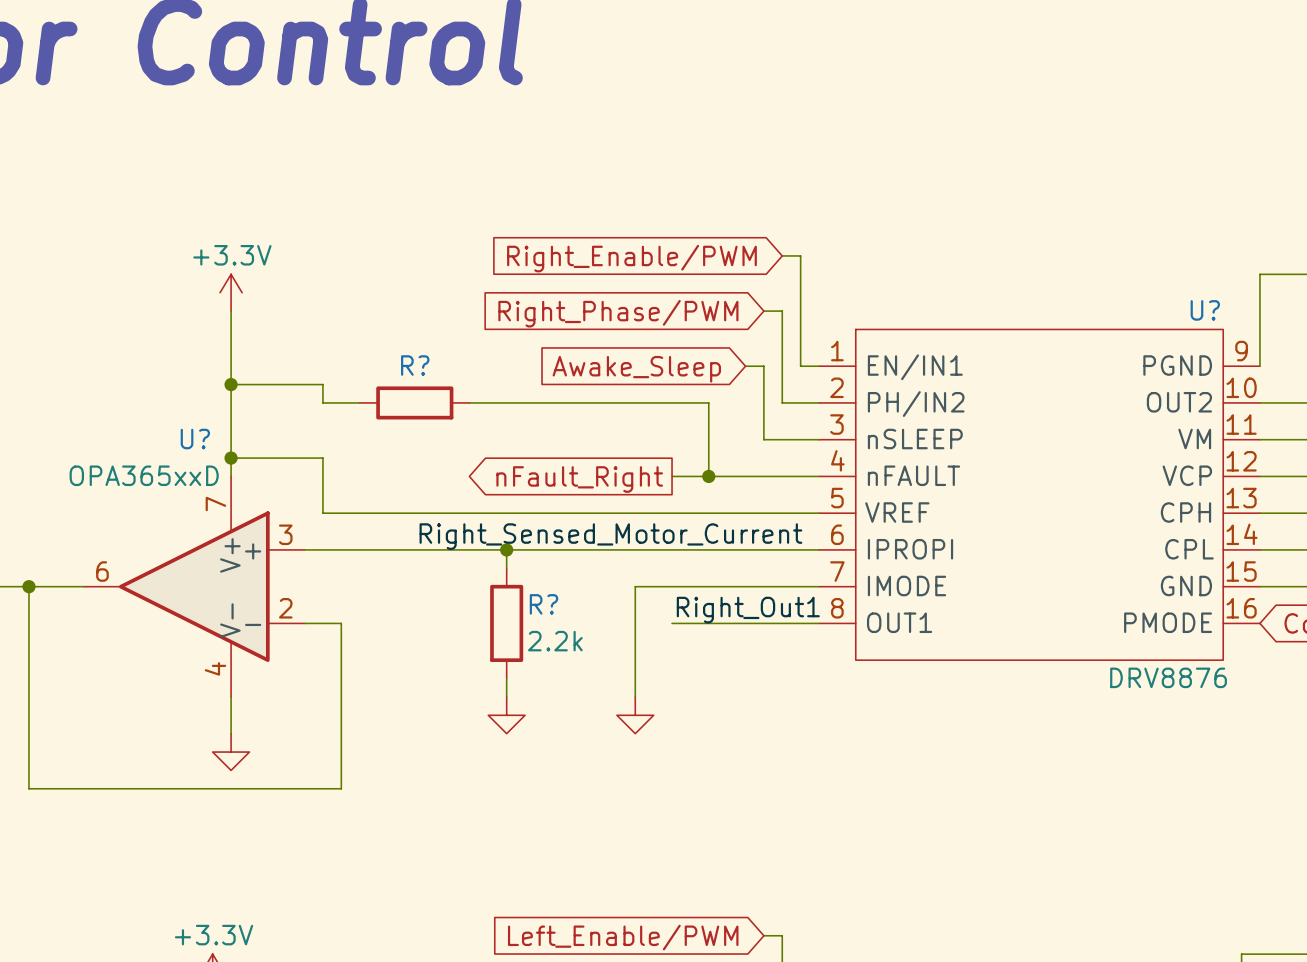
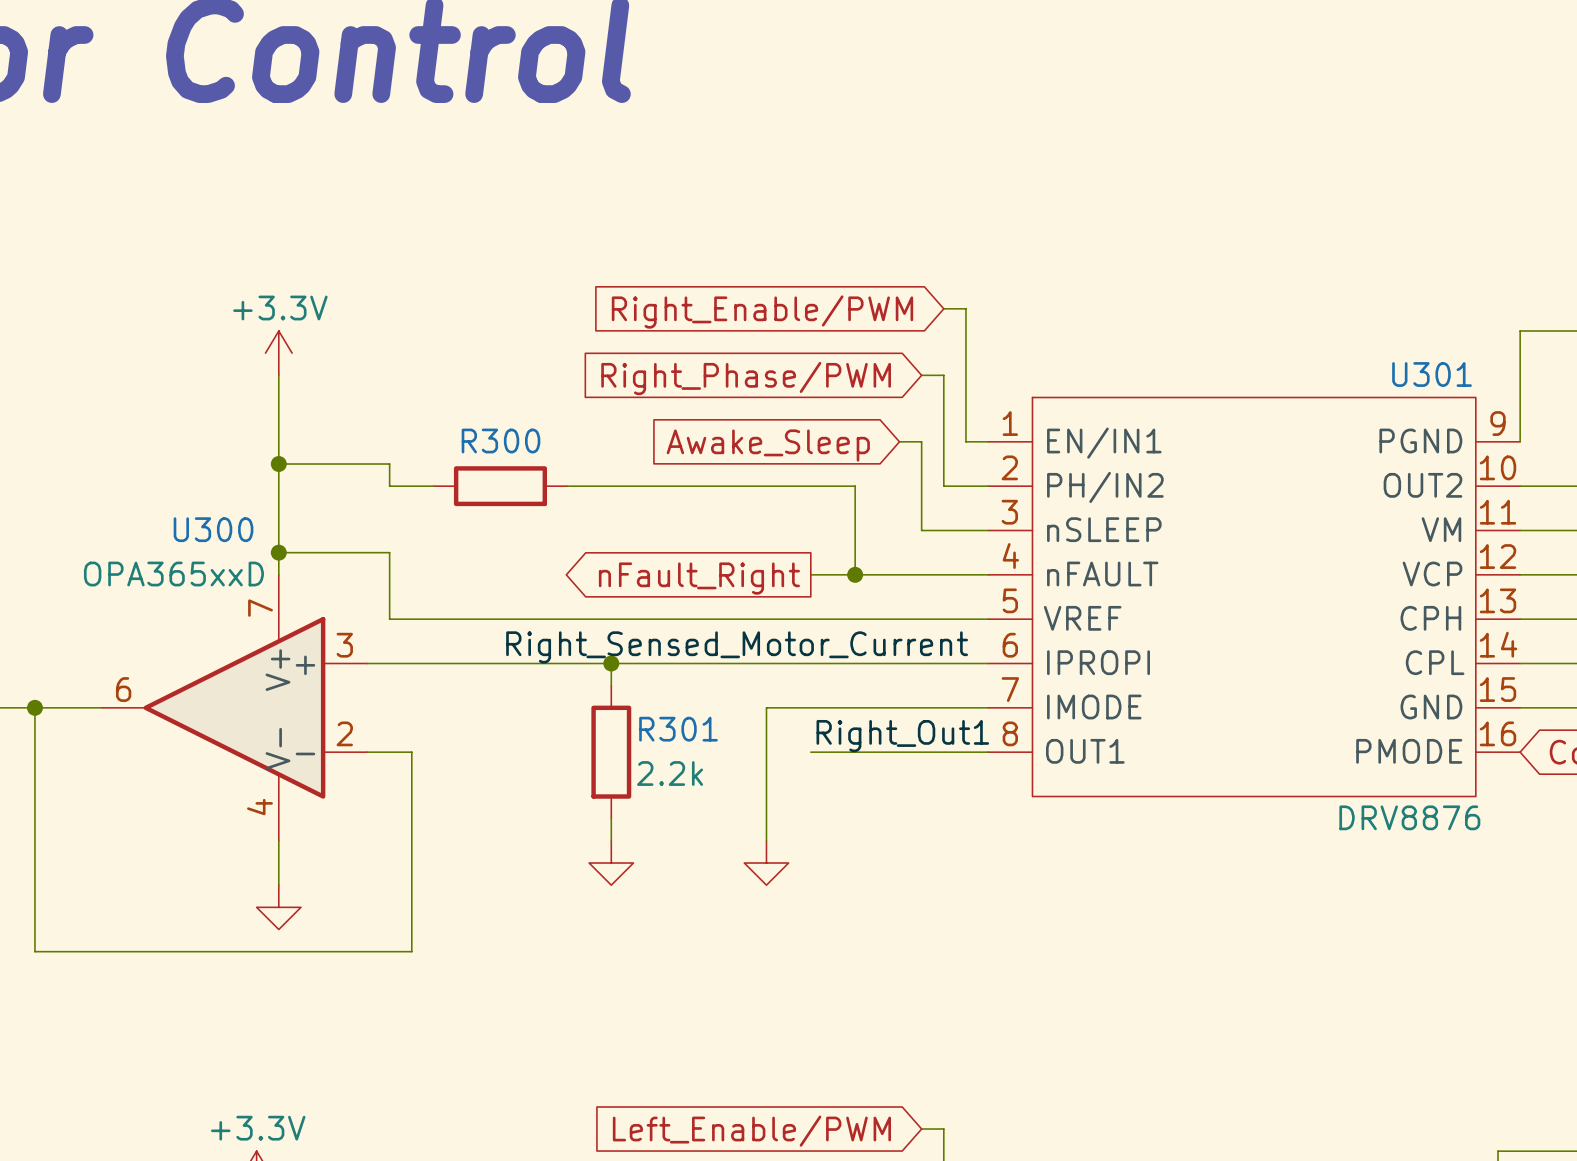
U? name: U? (1205, 310) -> U301 (1432, 374)
R? name: R? (415, 365) -> R300 (501, 441)
U? name: U? (195, 439) -> U300 (213, 529)
R? name: R? (543, 604) -> R301 (678, 729)

